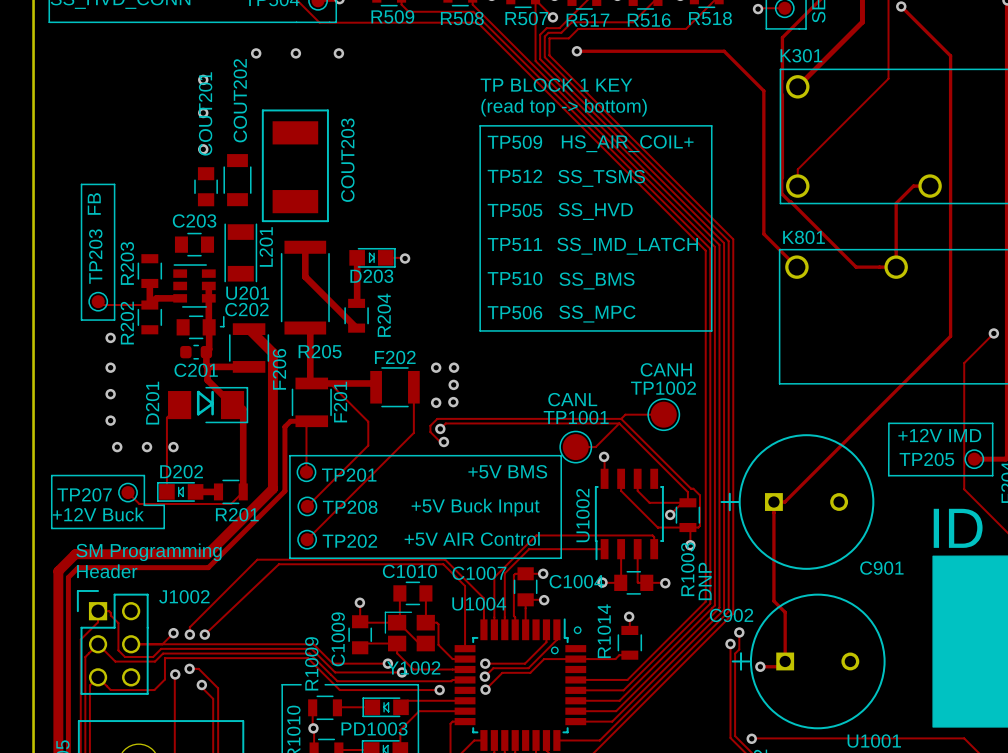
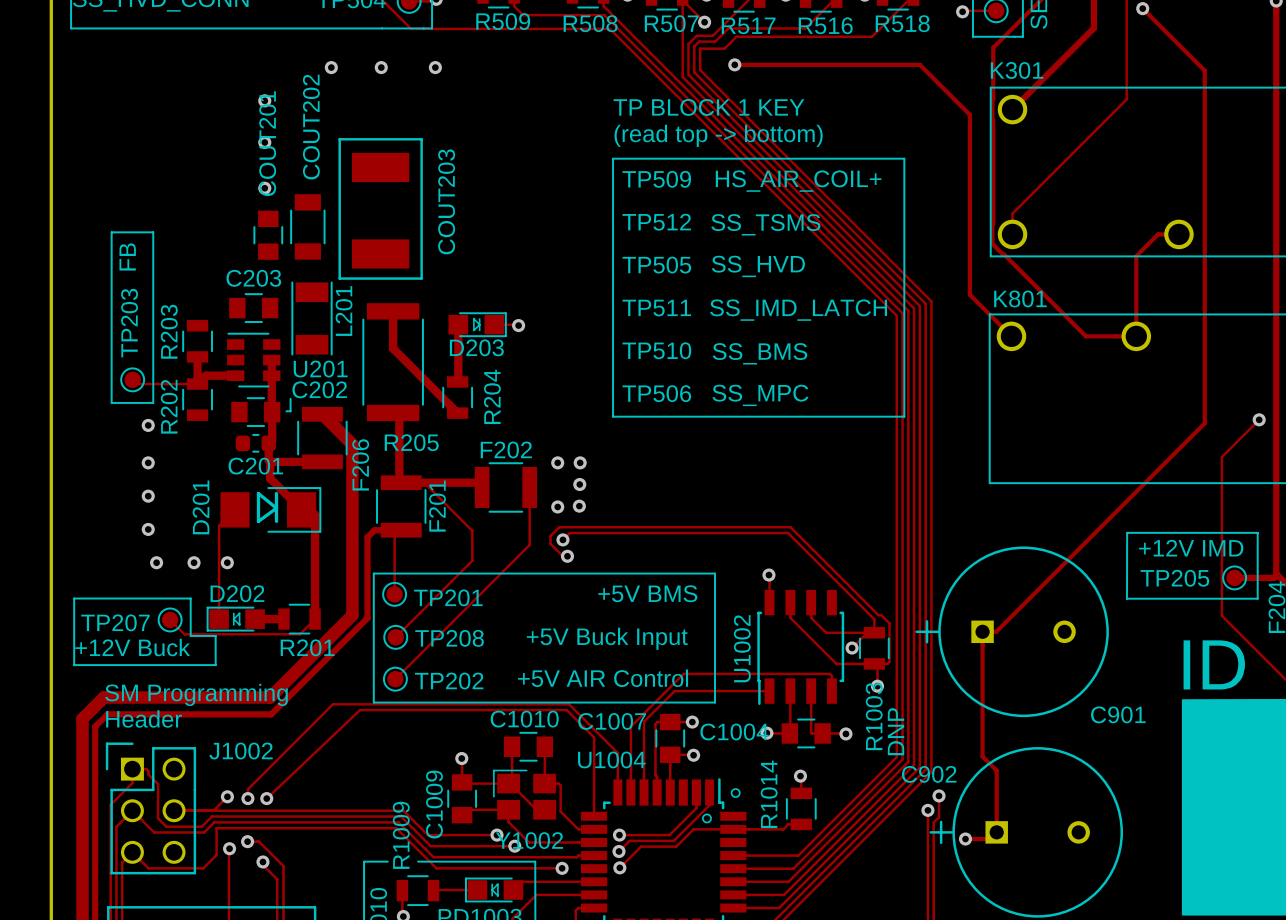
text: CANH (666, 369) -> none
text: CANL (572, 399) -> none
track: (663, 414) (625, 414) (621, 418) -> none
TP1002: (663, 414) -> none
track: (619, 423) (595, 447) (575, 447) -> none
TP1001: (575, 447) -> none

